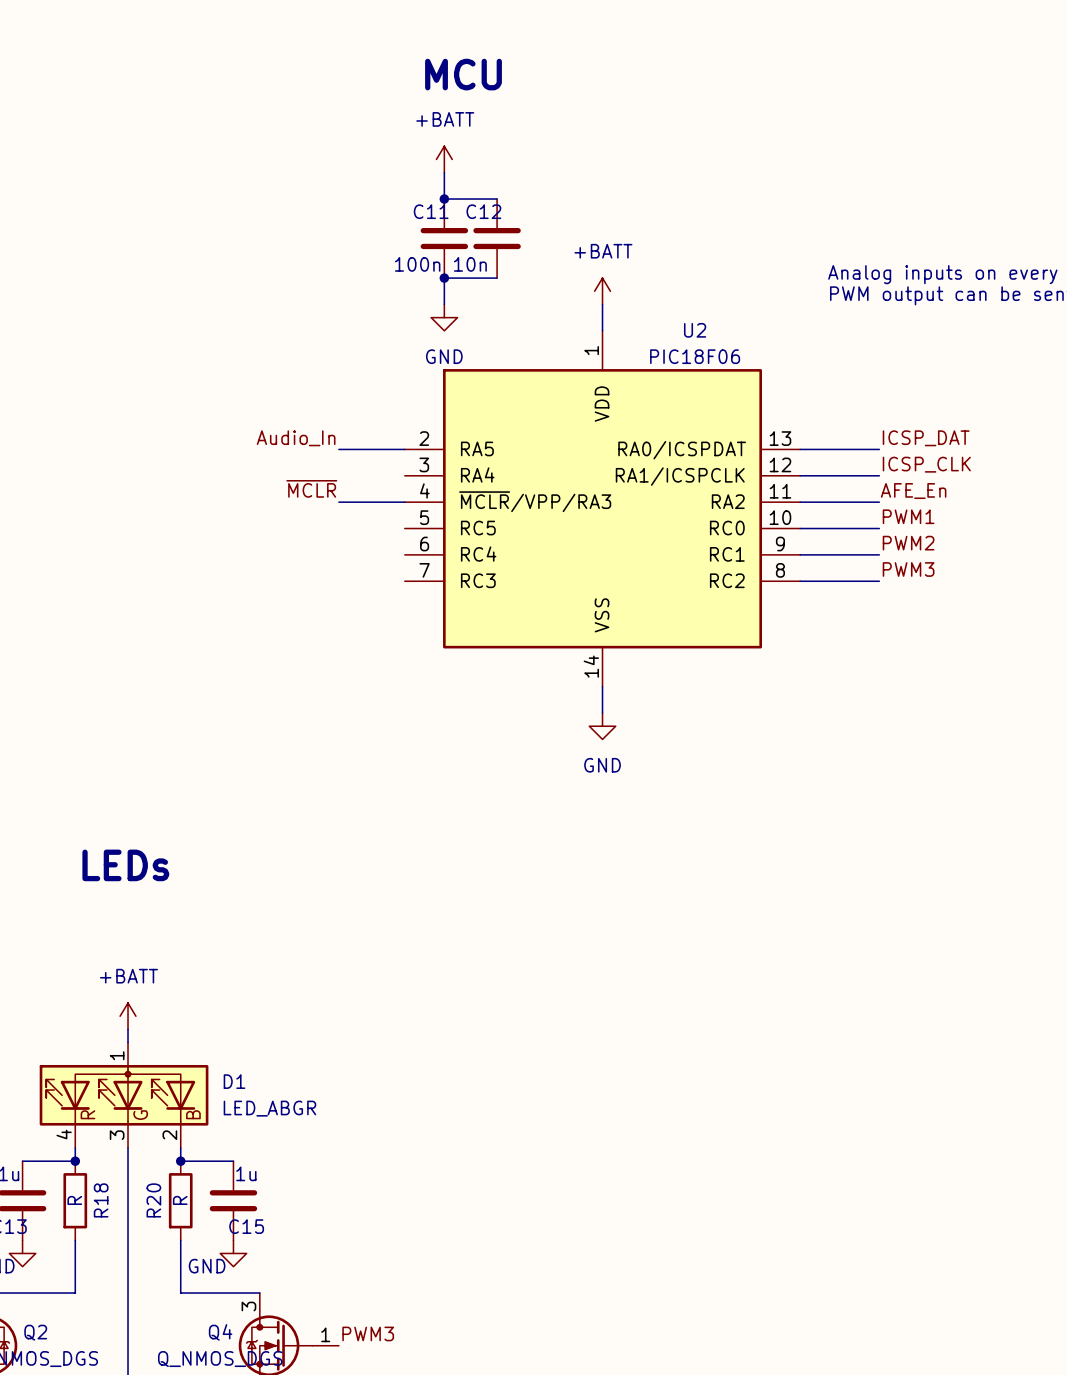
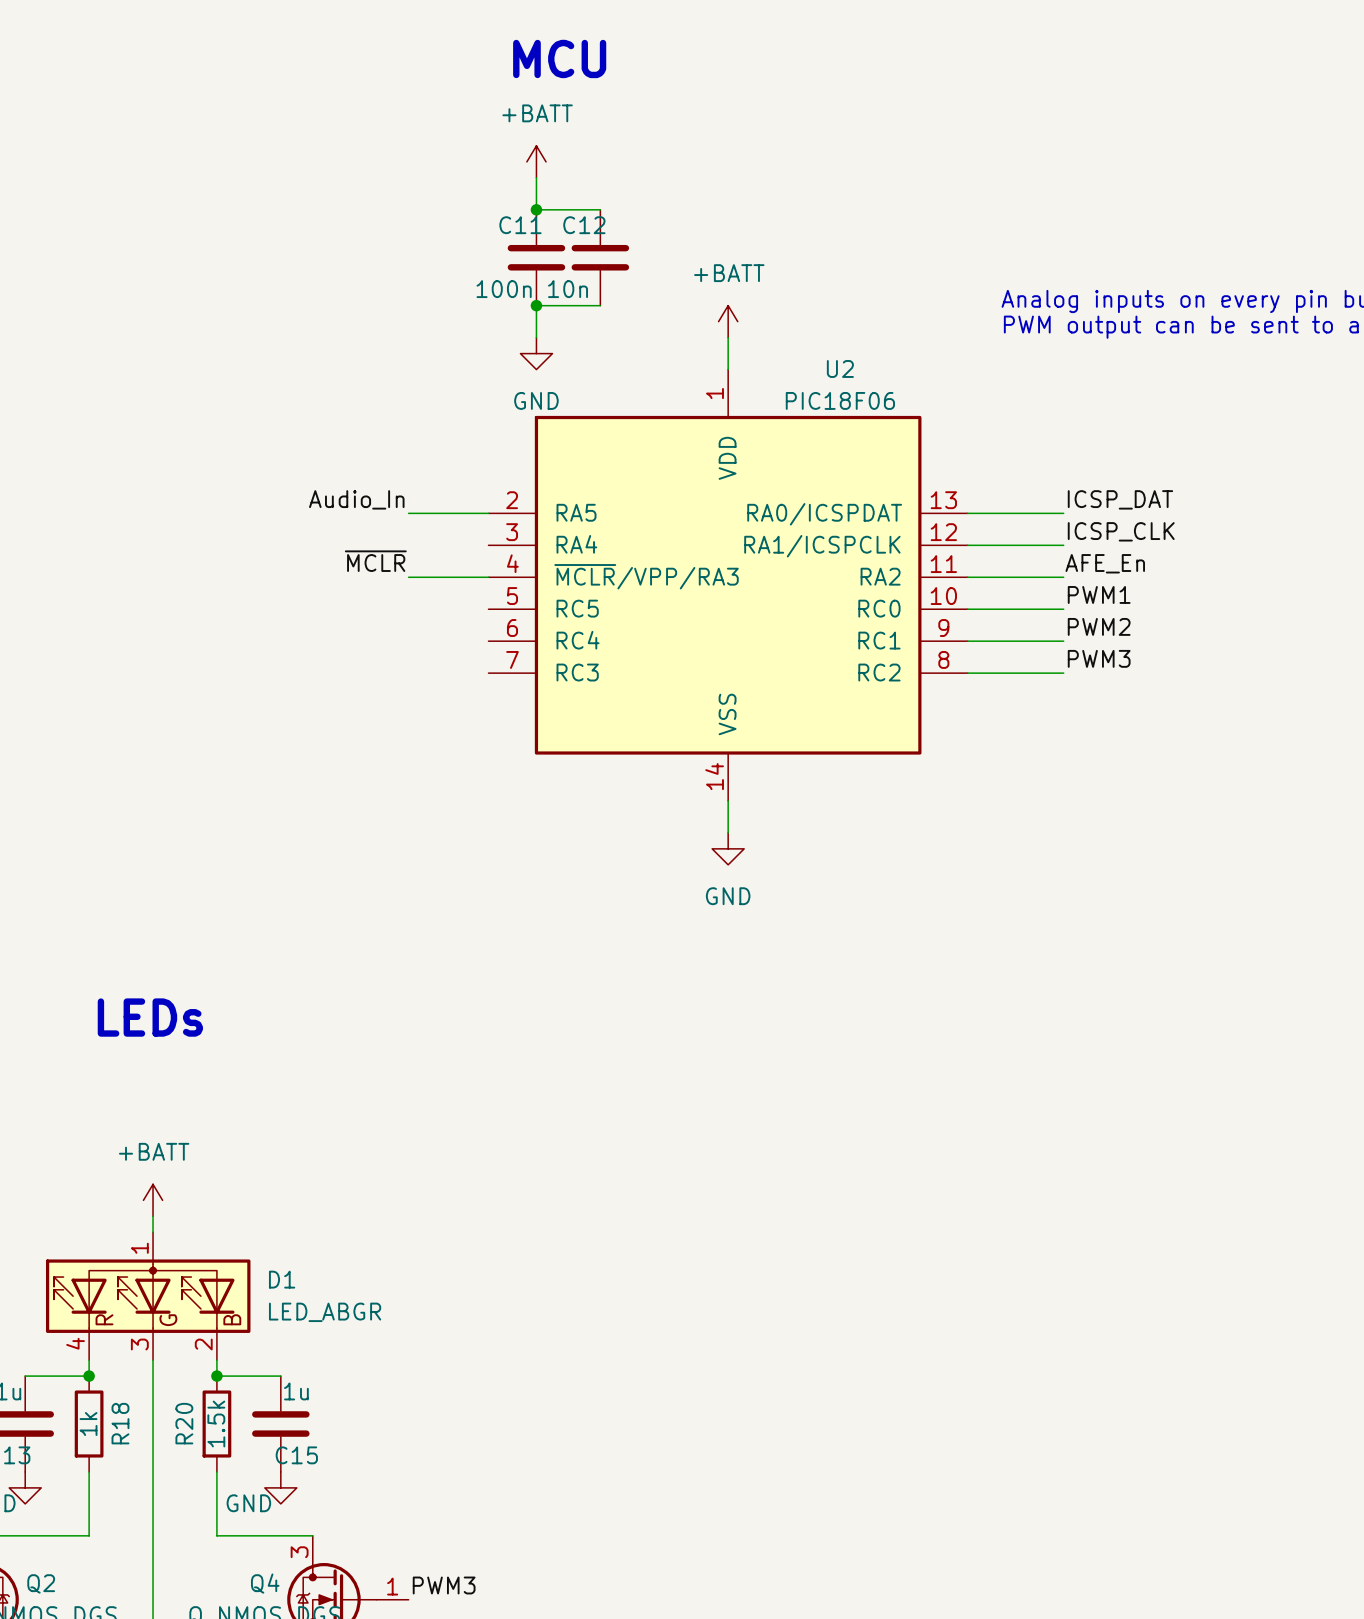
R18 value: R (74, 1200) -> 1k (88, 1424)
R20 value: R (180, 1200) -> 1.5k (216, 1424)

